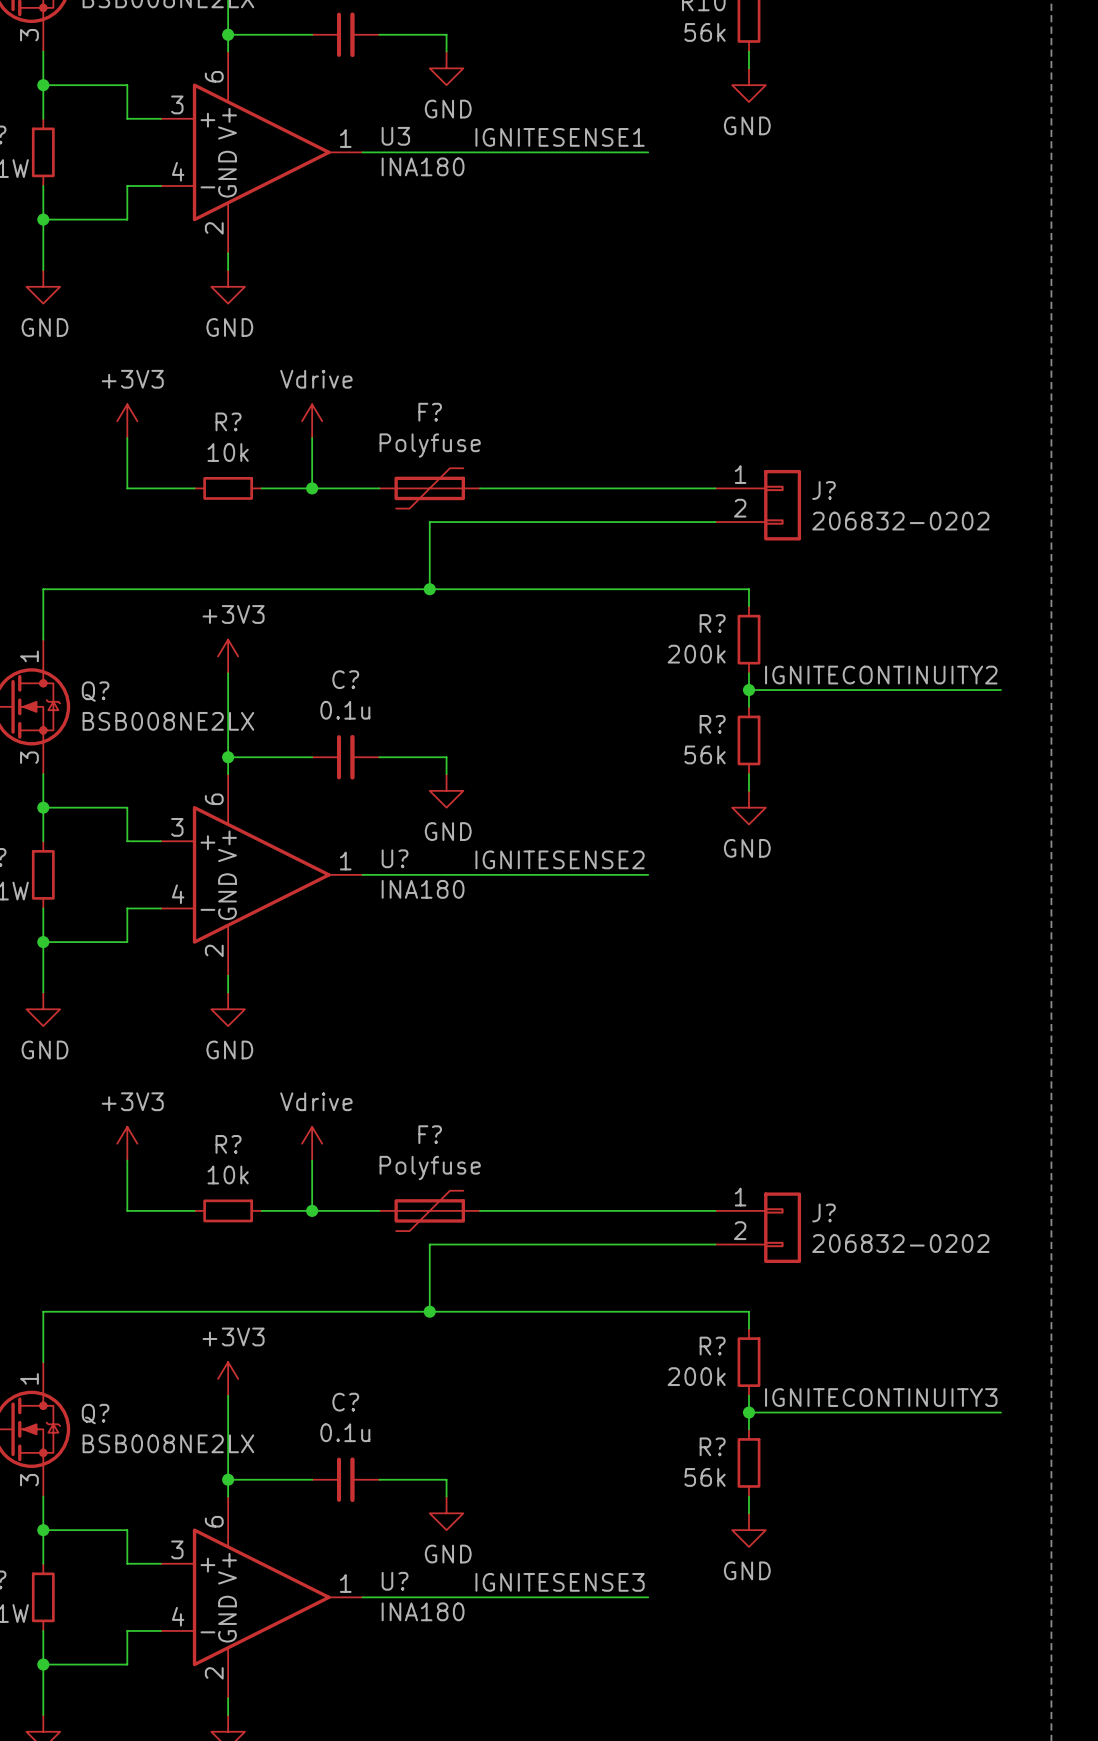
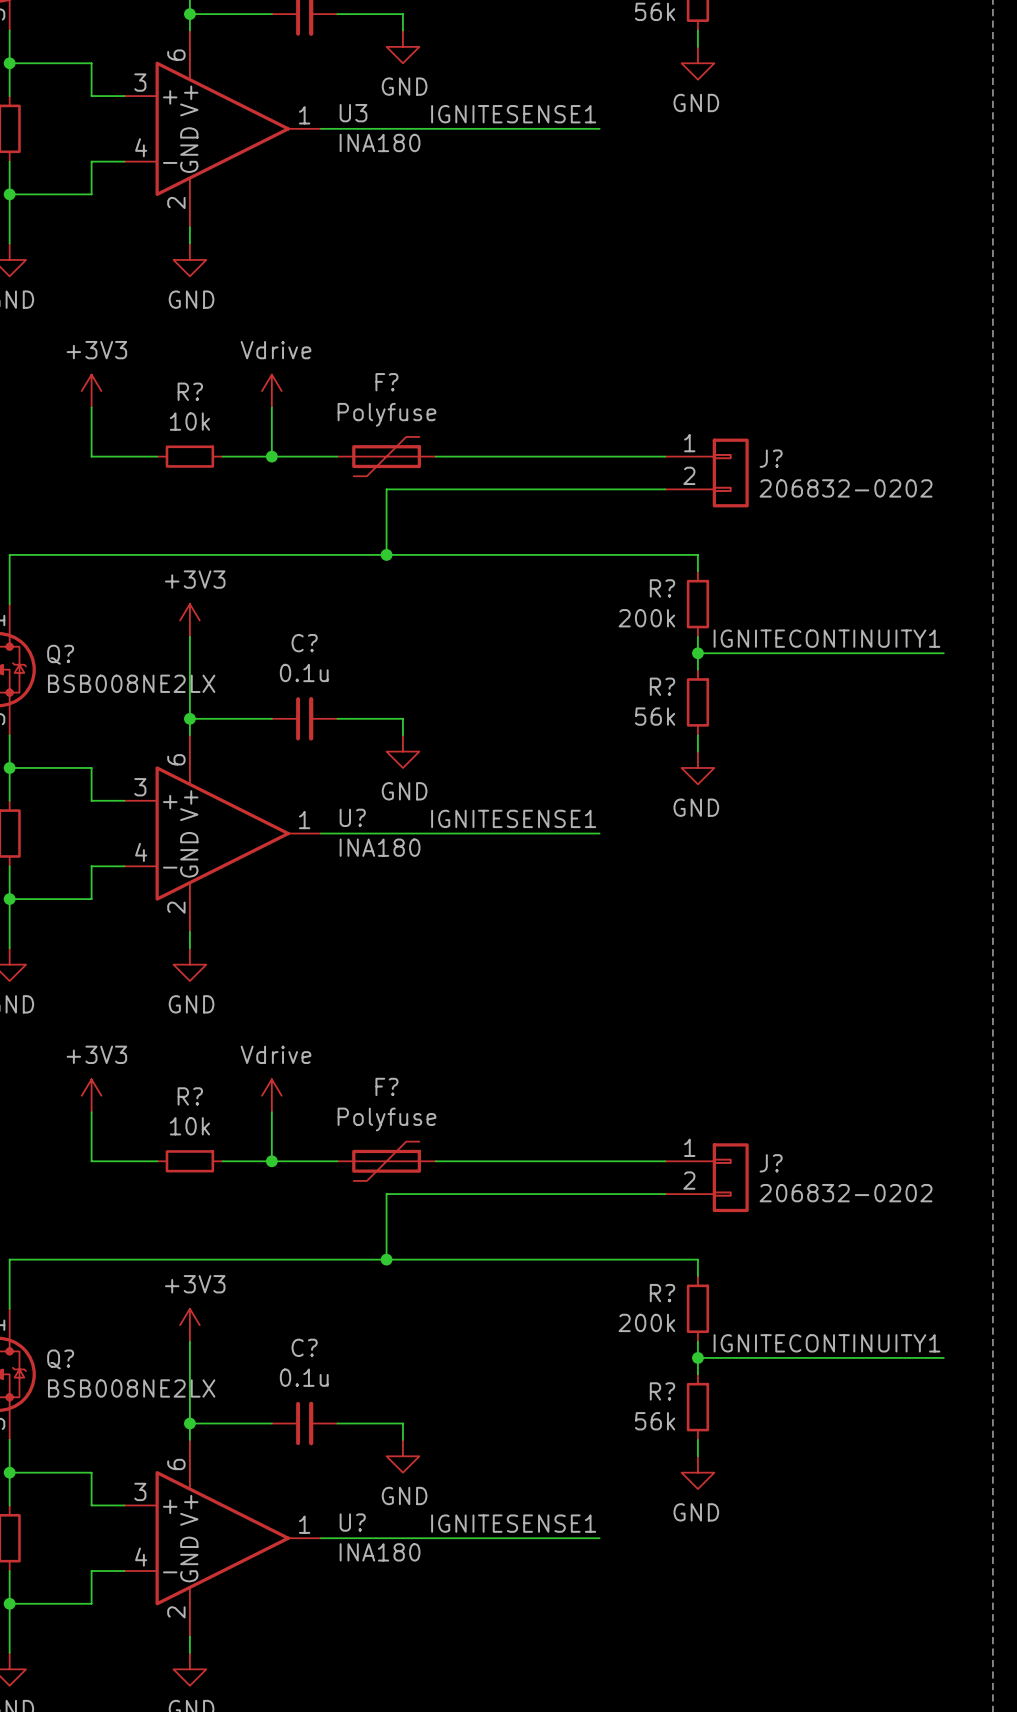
label: IGNITECONTINUITY2 (881, 675) -> IGNITECONTINUITY1 (826, 638)
label: IGNITESENSE2 (560, 859) -> IGNITESENSE1 (513, 818)
label: IGNITECONTINUITY3 (881, 1397) -> IGNITECONTINUITY1 (826, 1343)
label: IGNITESENSE3 (560, 1582) -> IGNITESENSE1 (513, 1523)

